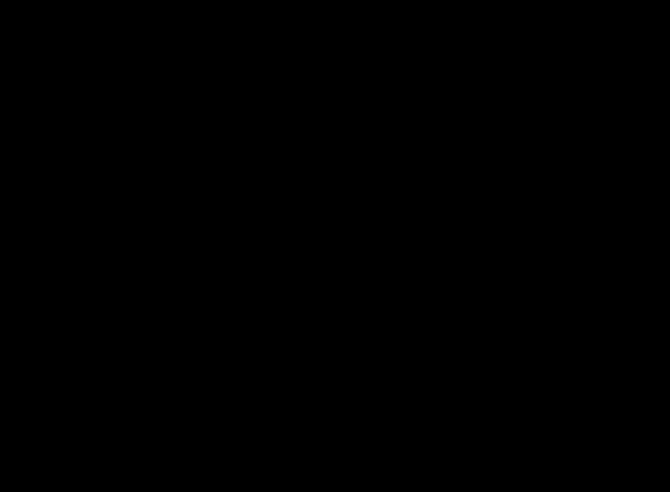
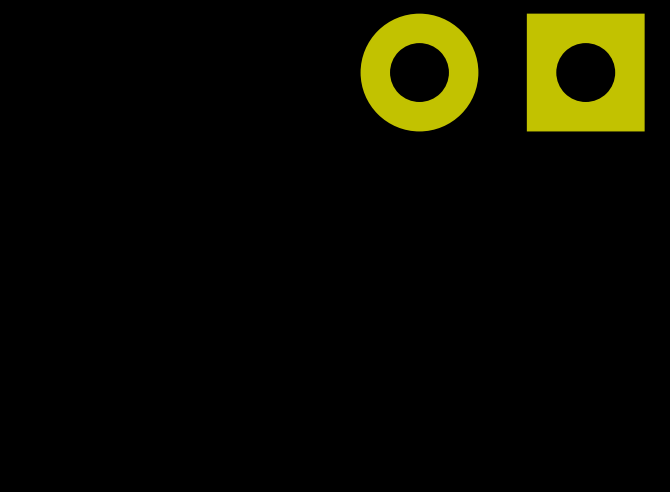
part: none -> (502, 72)

